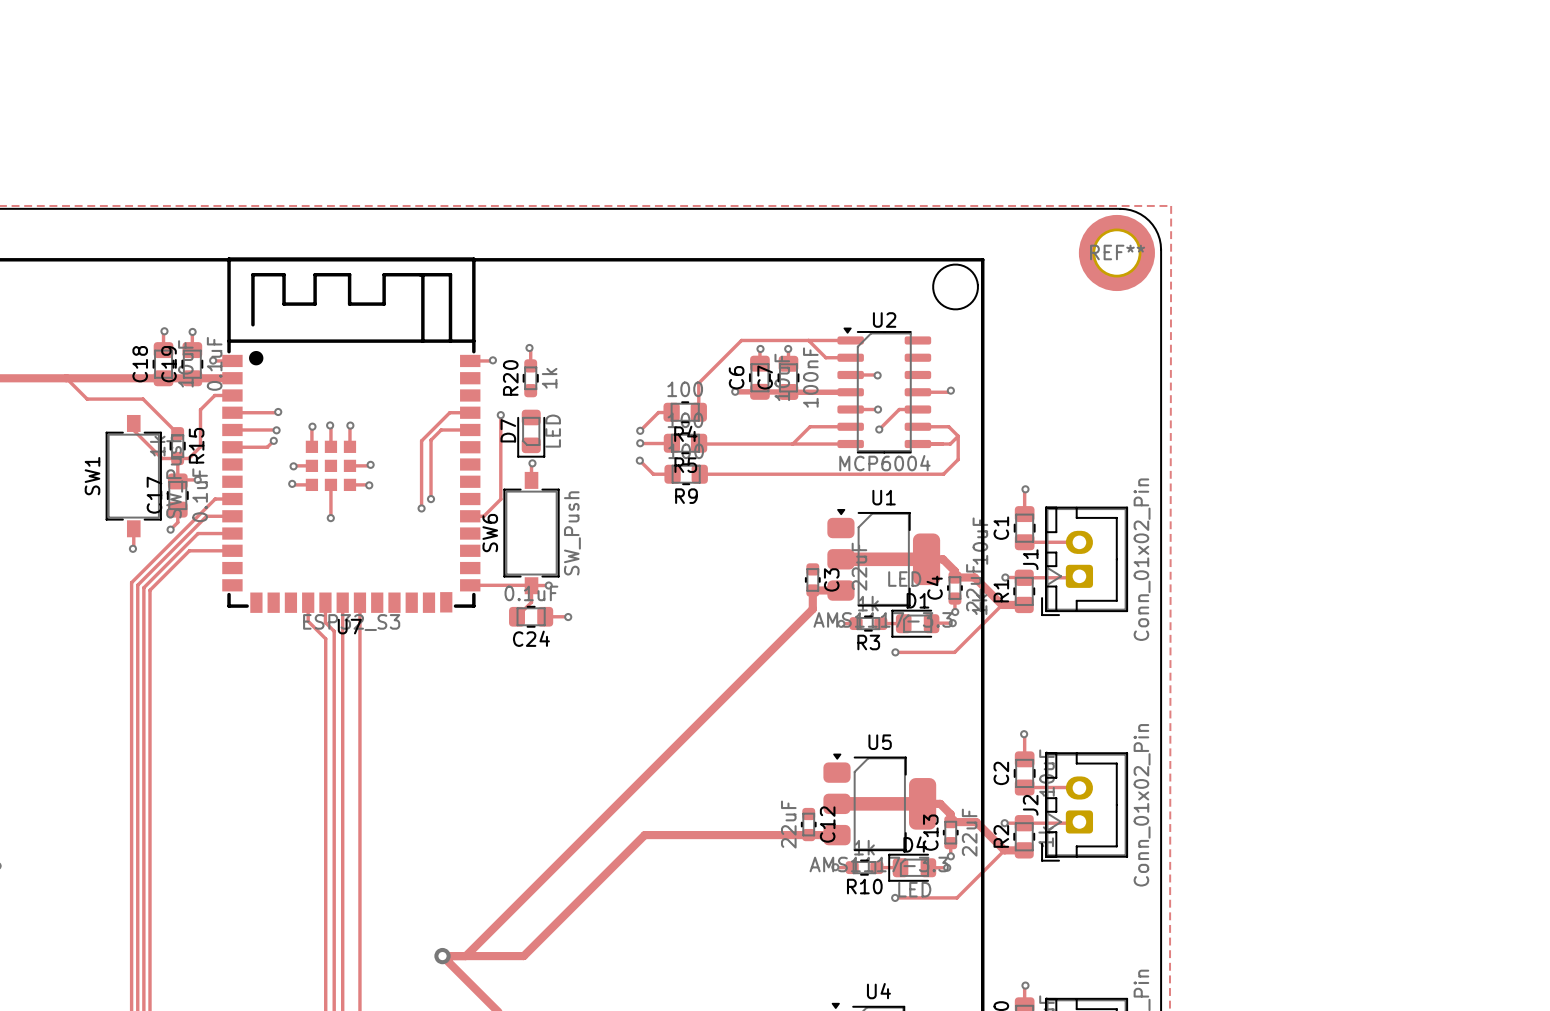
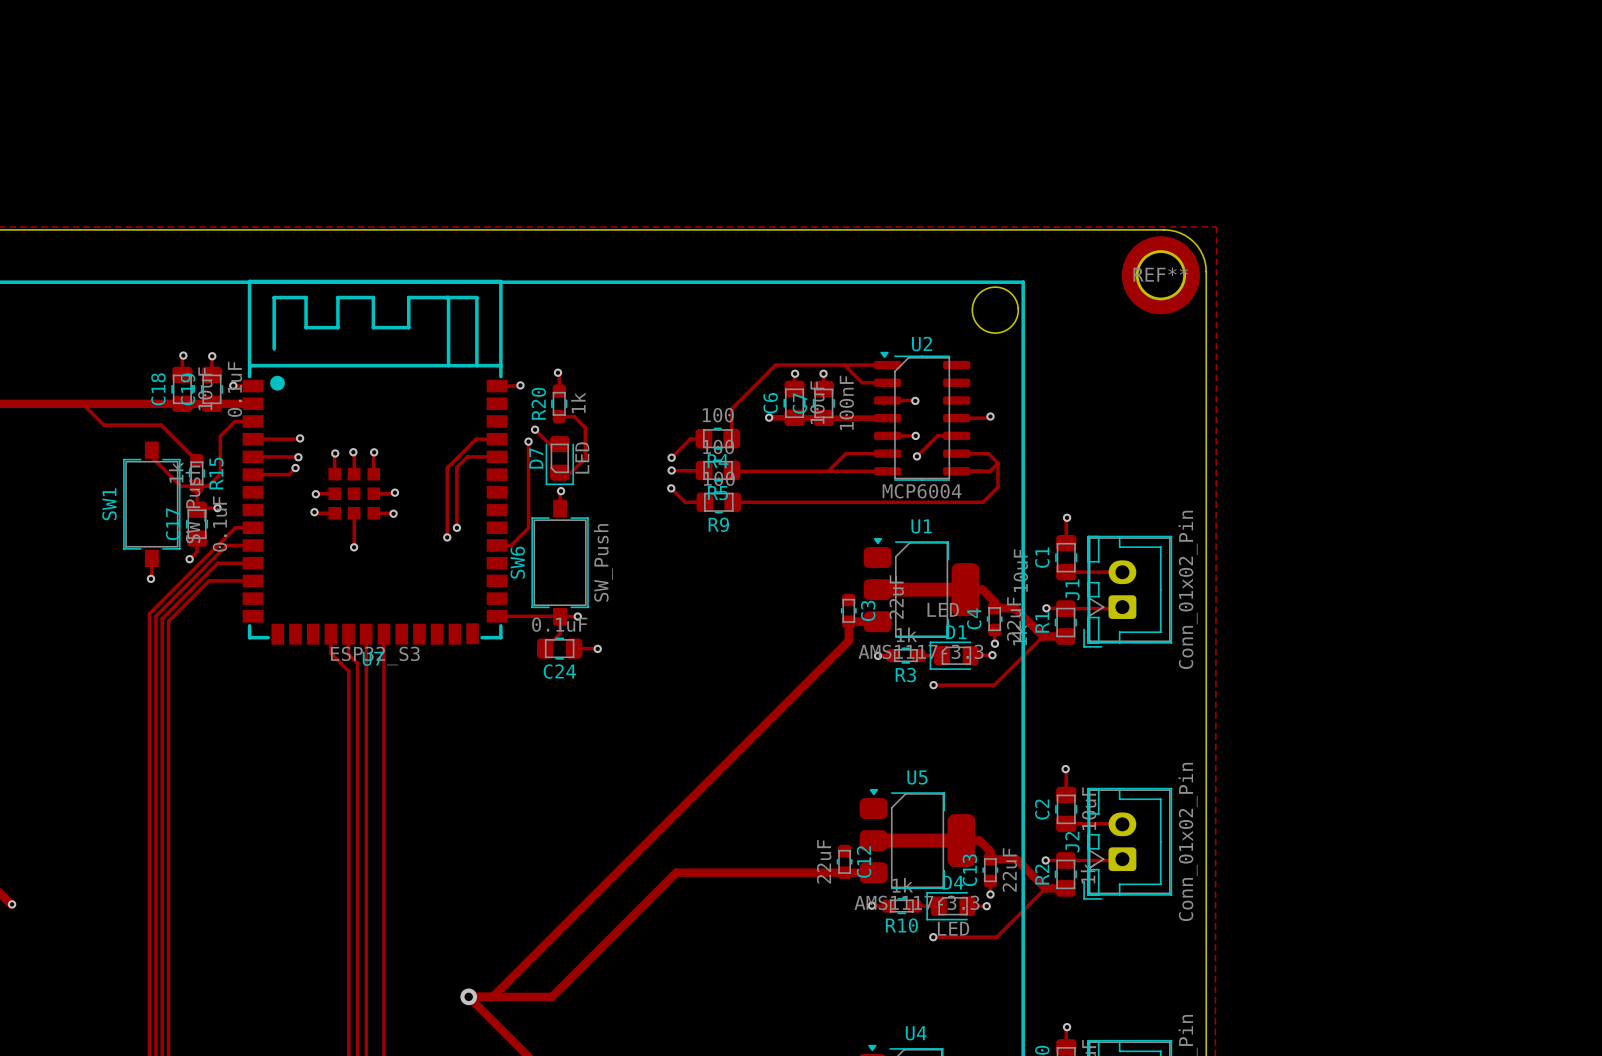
track: none -> (559, 416) (574, 416) (585, 427) (585, 458) (571, 472) (559, 472)
track: none -> (535, 429) (549, 444) (559, 444)
via: none -> (535, 429)

